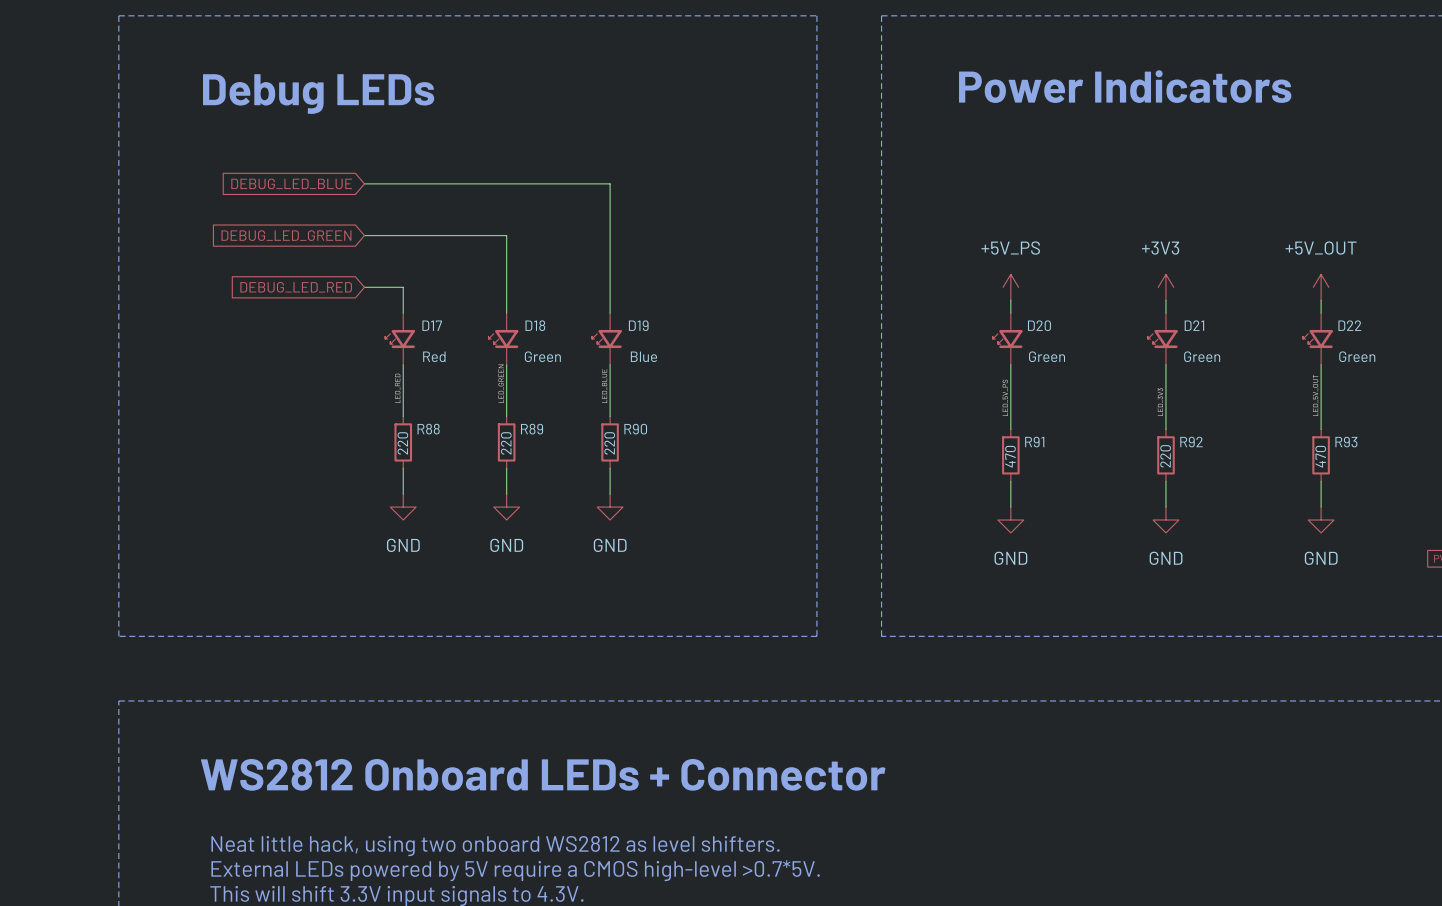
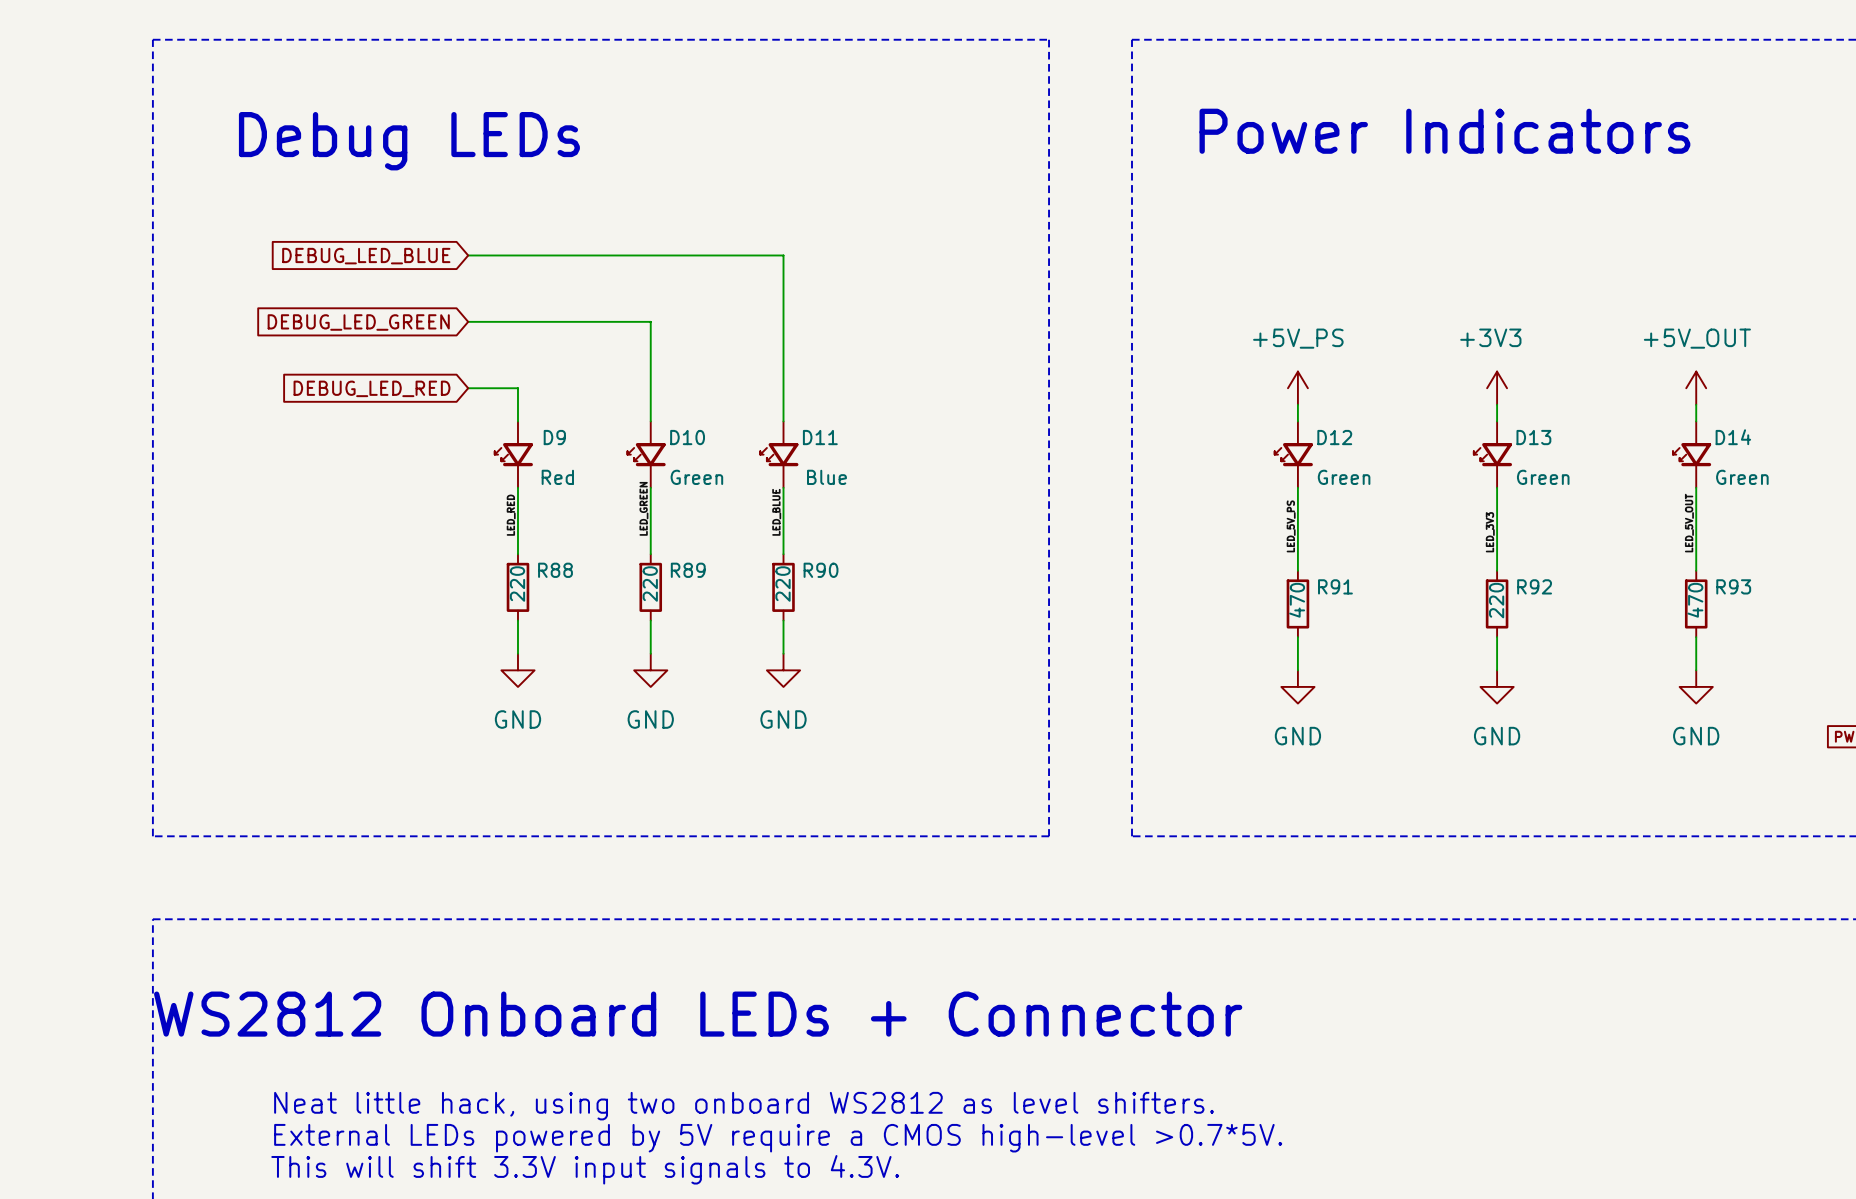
D17 name: D17 (432, 325) -> D9 (554, 437)
D18 name: D18 (535, 325) -> D10 (687, 437)
D19 name: D19 (638, 325) -> D11 (820, 437)
D20 name: D20 (1039, 325) -> D12 (1334, 437)
D21 name: D21 (1194, 325) -> D13 (1533, 437)
D22 name: D22 (1349, 325) -> D14 (1733, 437)

